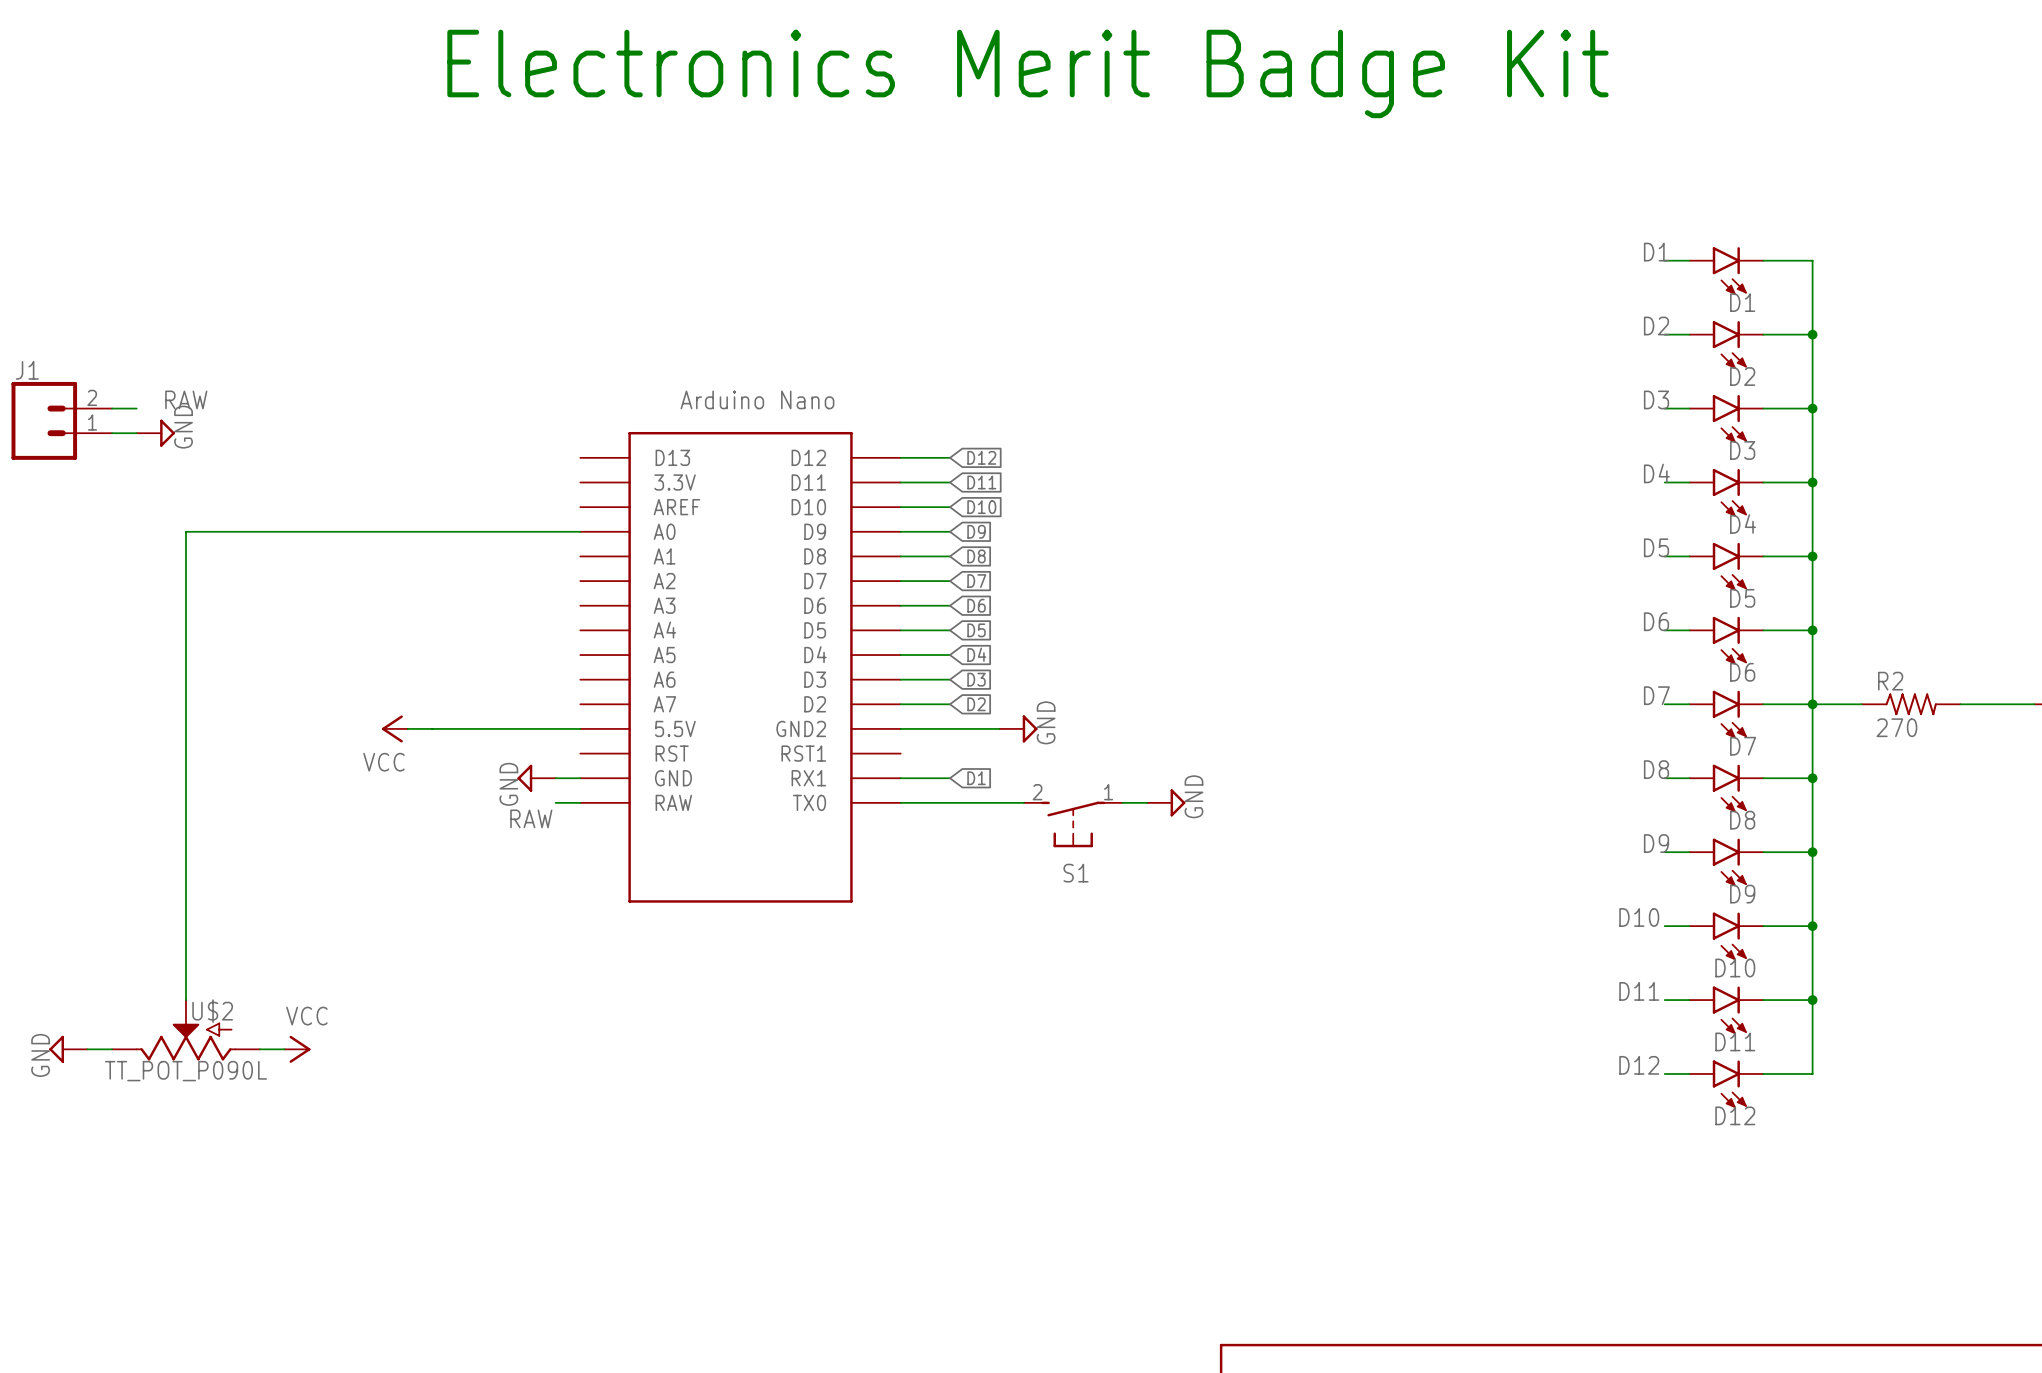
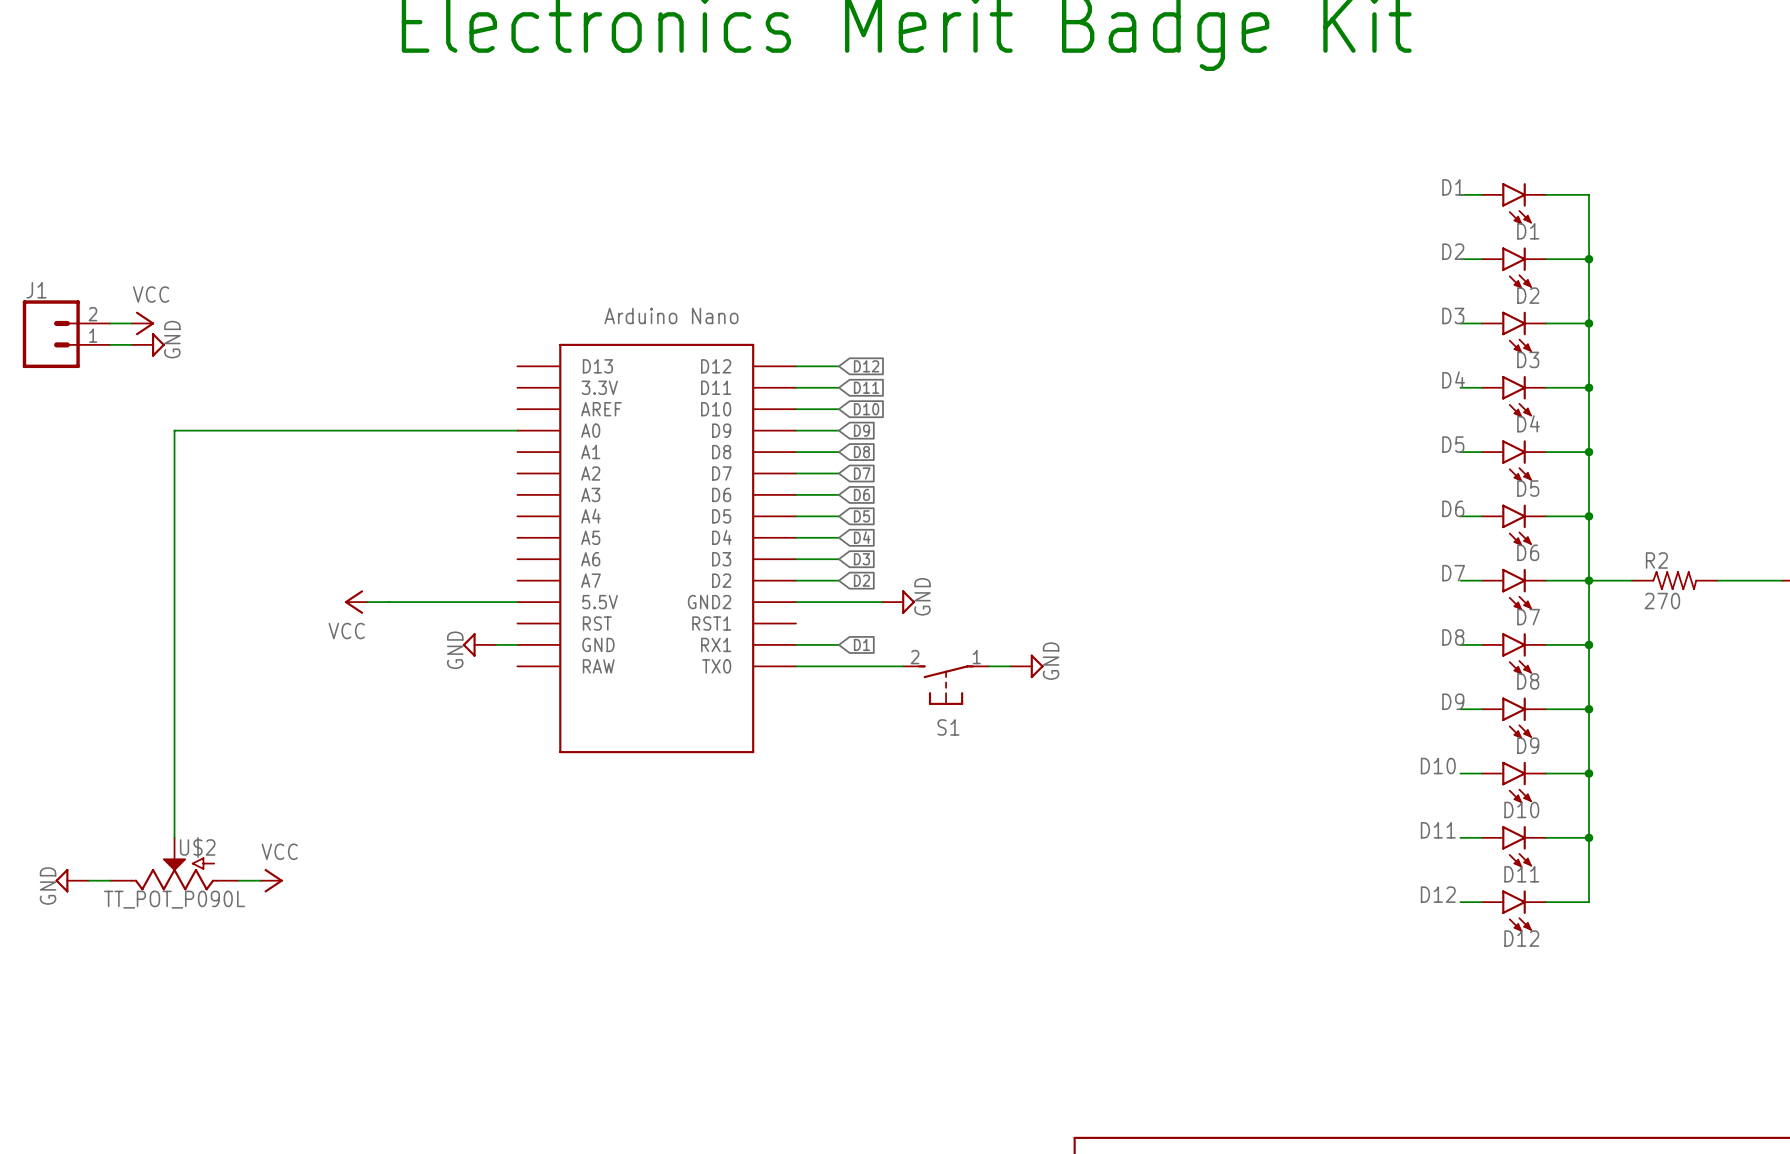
label: RAW (186, 399) -> none
power symbol: none -> VCC (142, 323)
wire: (555, 802) (580, 802) -> none
label: RAW (531, 818) -> none

